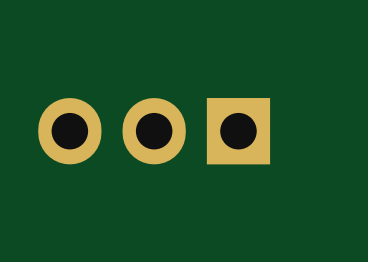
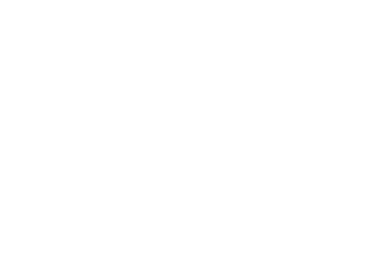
part: (154, 131) -> none

